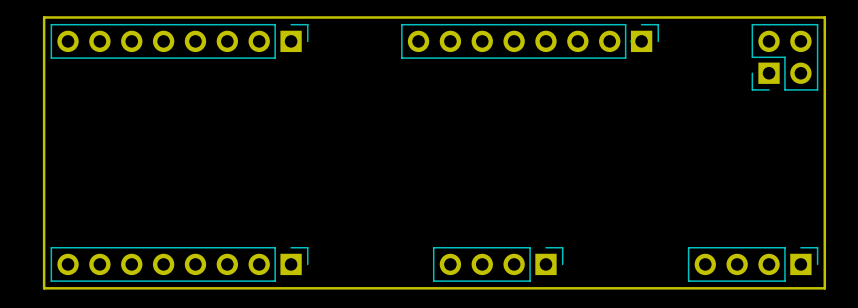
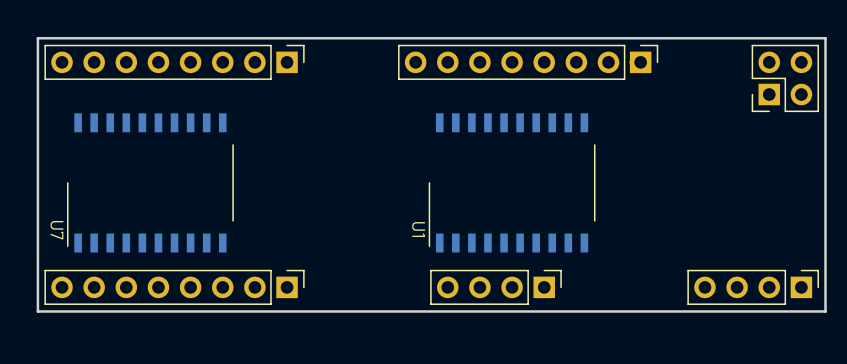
U7: none -> (150, 182)
U1: none -> (512, 182)

